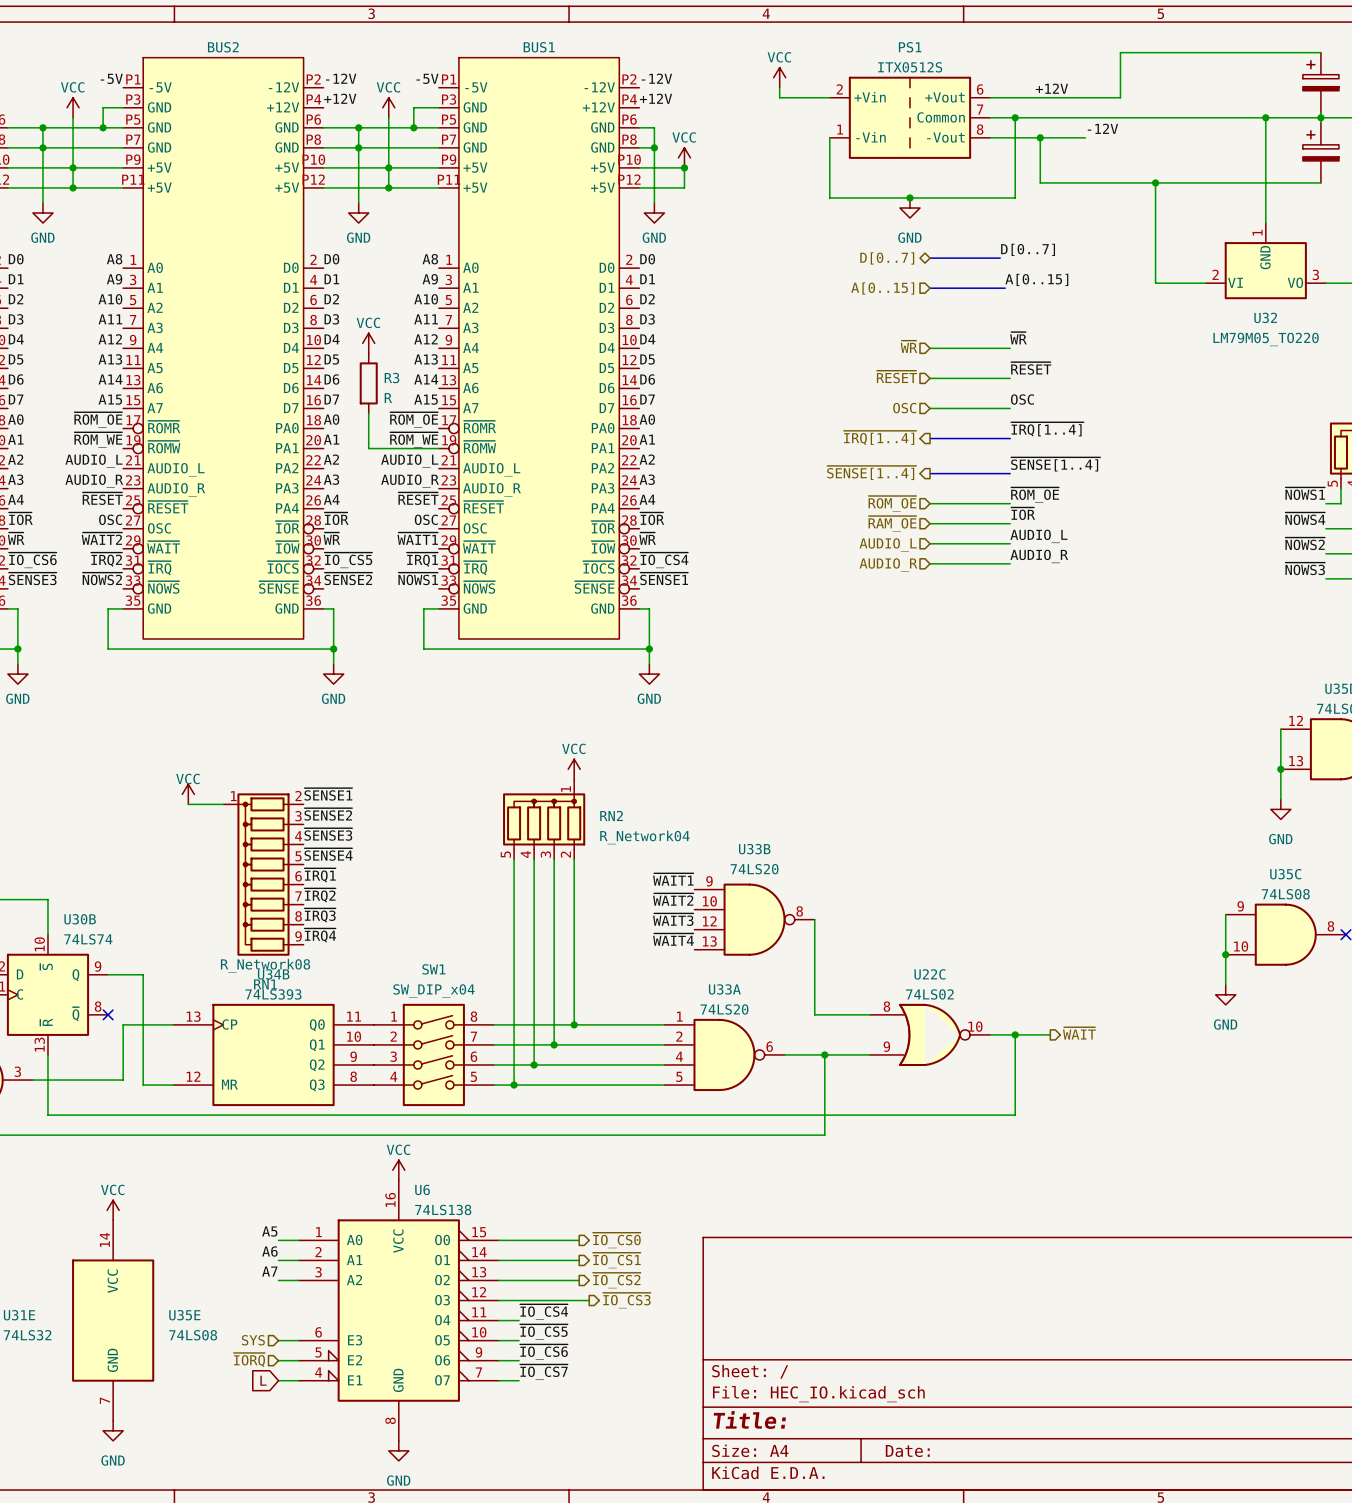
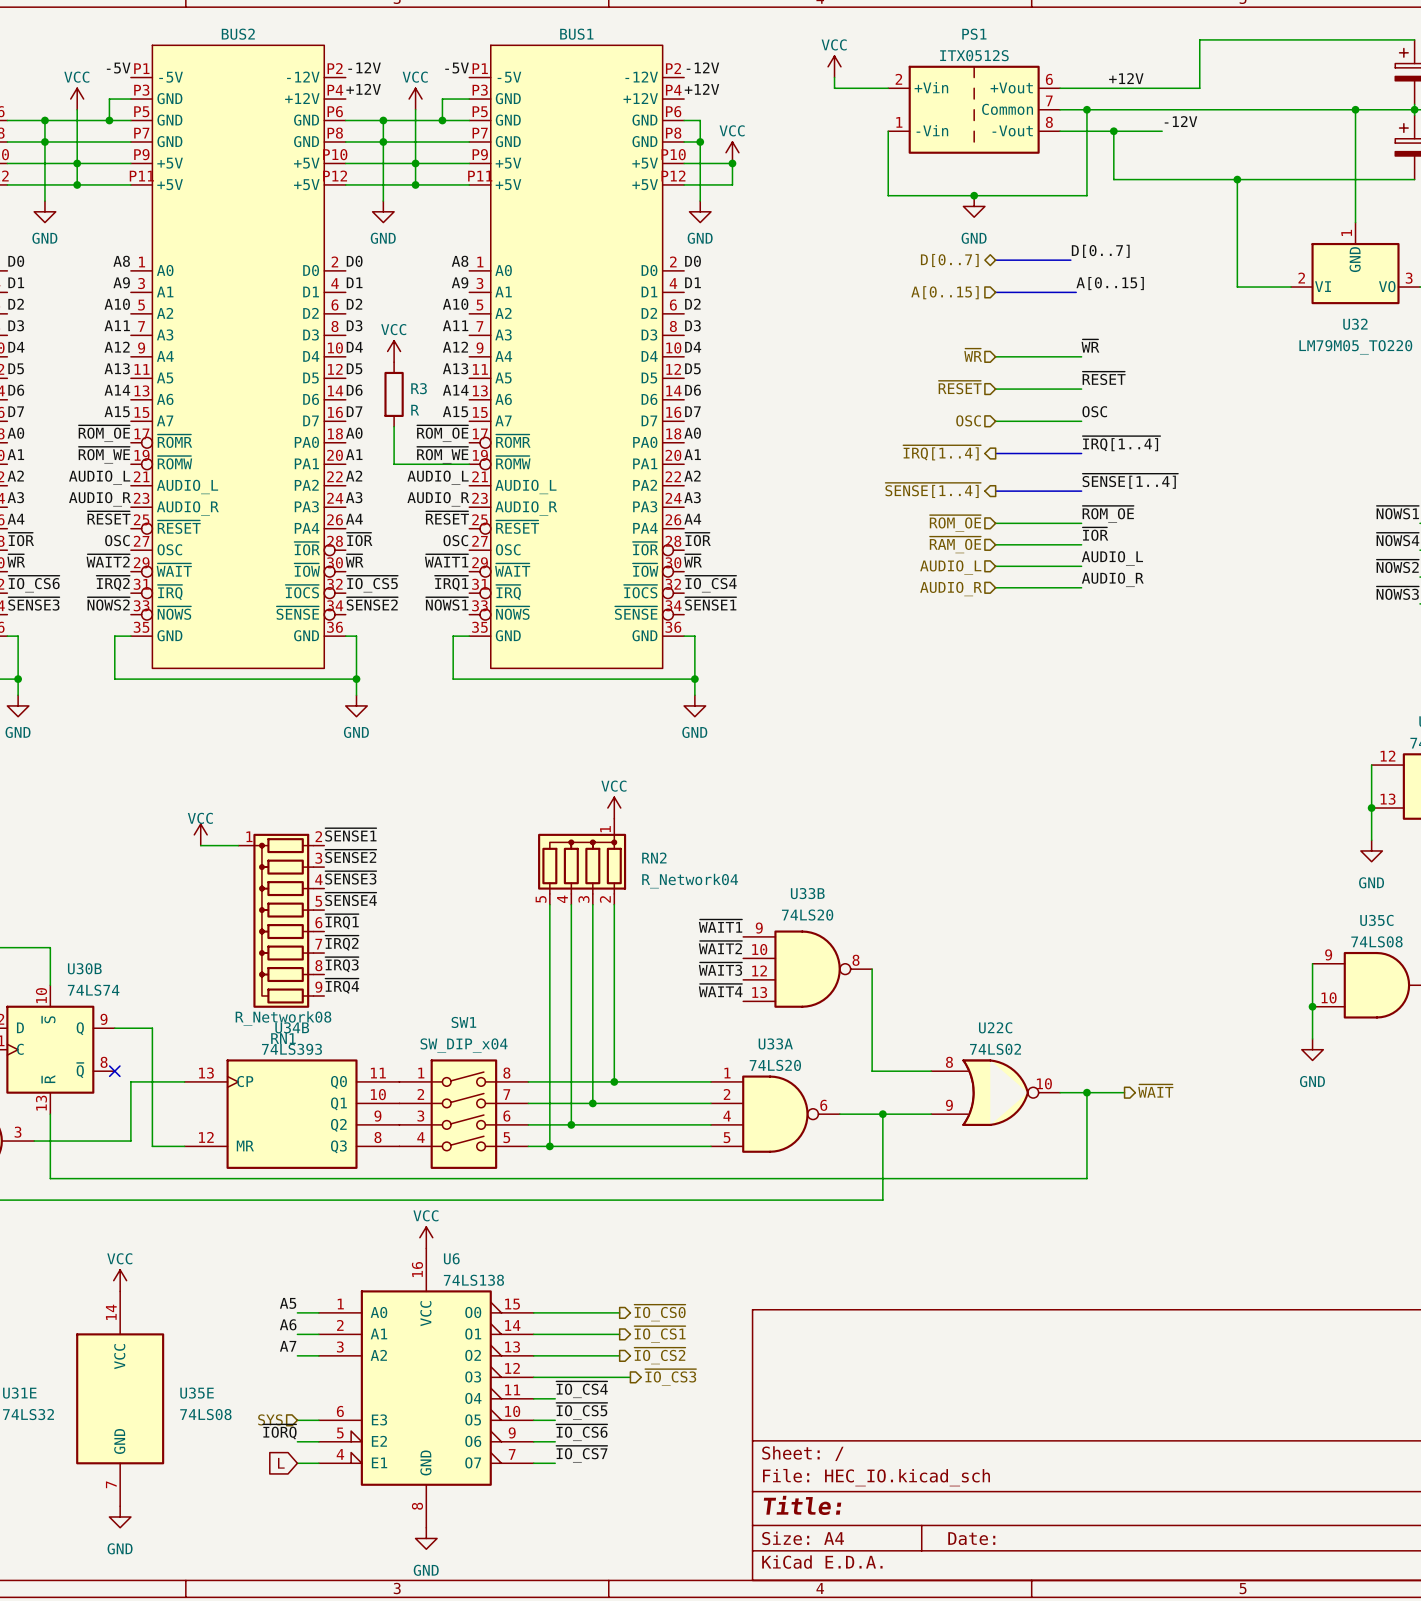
label: none -> ~{IORQ} (279, 1431)
hierarchical label: ~{IORQ} (249, 1360) -> none

